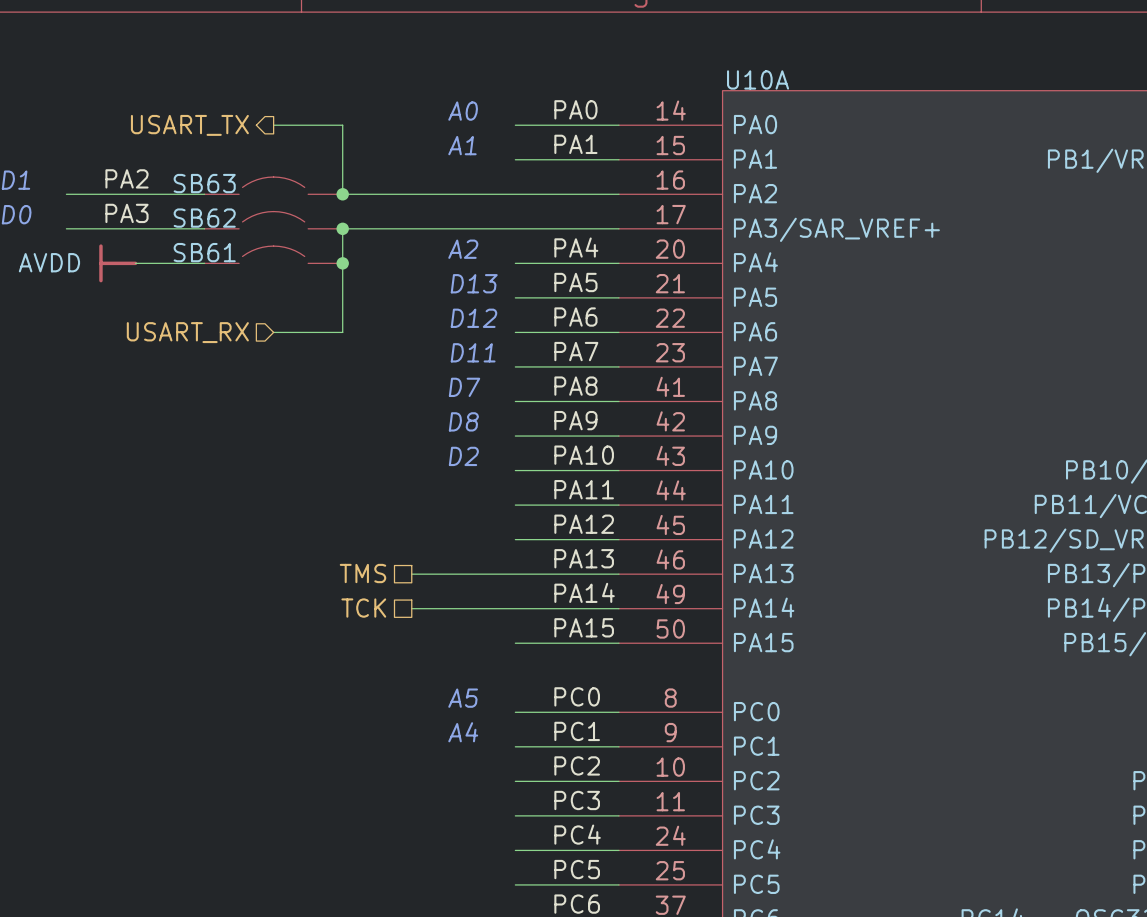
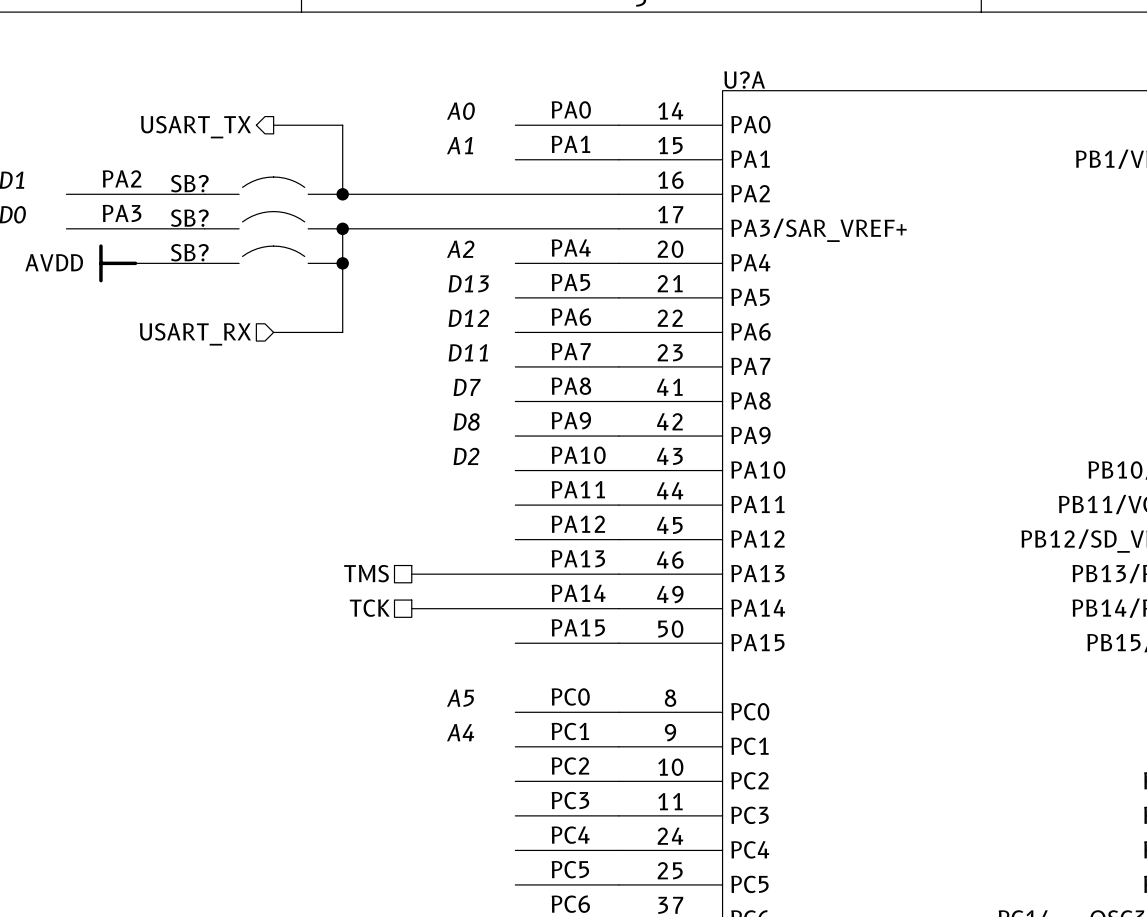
U10A name: U10A (758, 79) -> U?A (744, 80)
SB63 name: SB63 (204, 183) -> SB? (189, 183)
SB62 name: SB62 (204, 218) -> SB? (189, 218)
SB61 name: SB61 (204, 252) -> SB? (189, 252)

